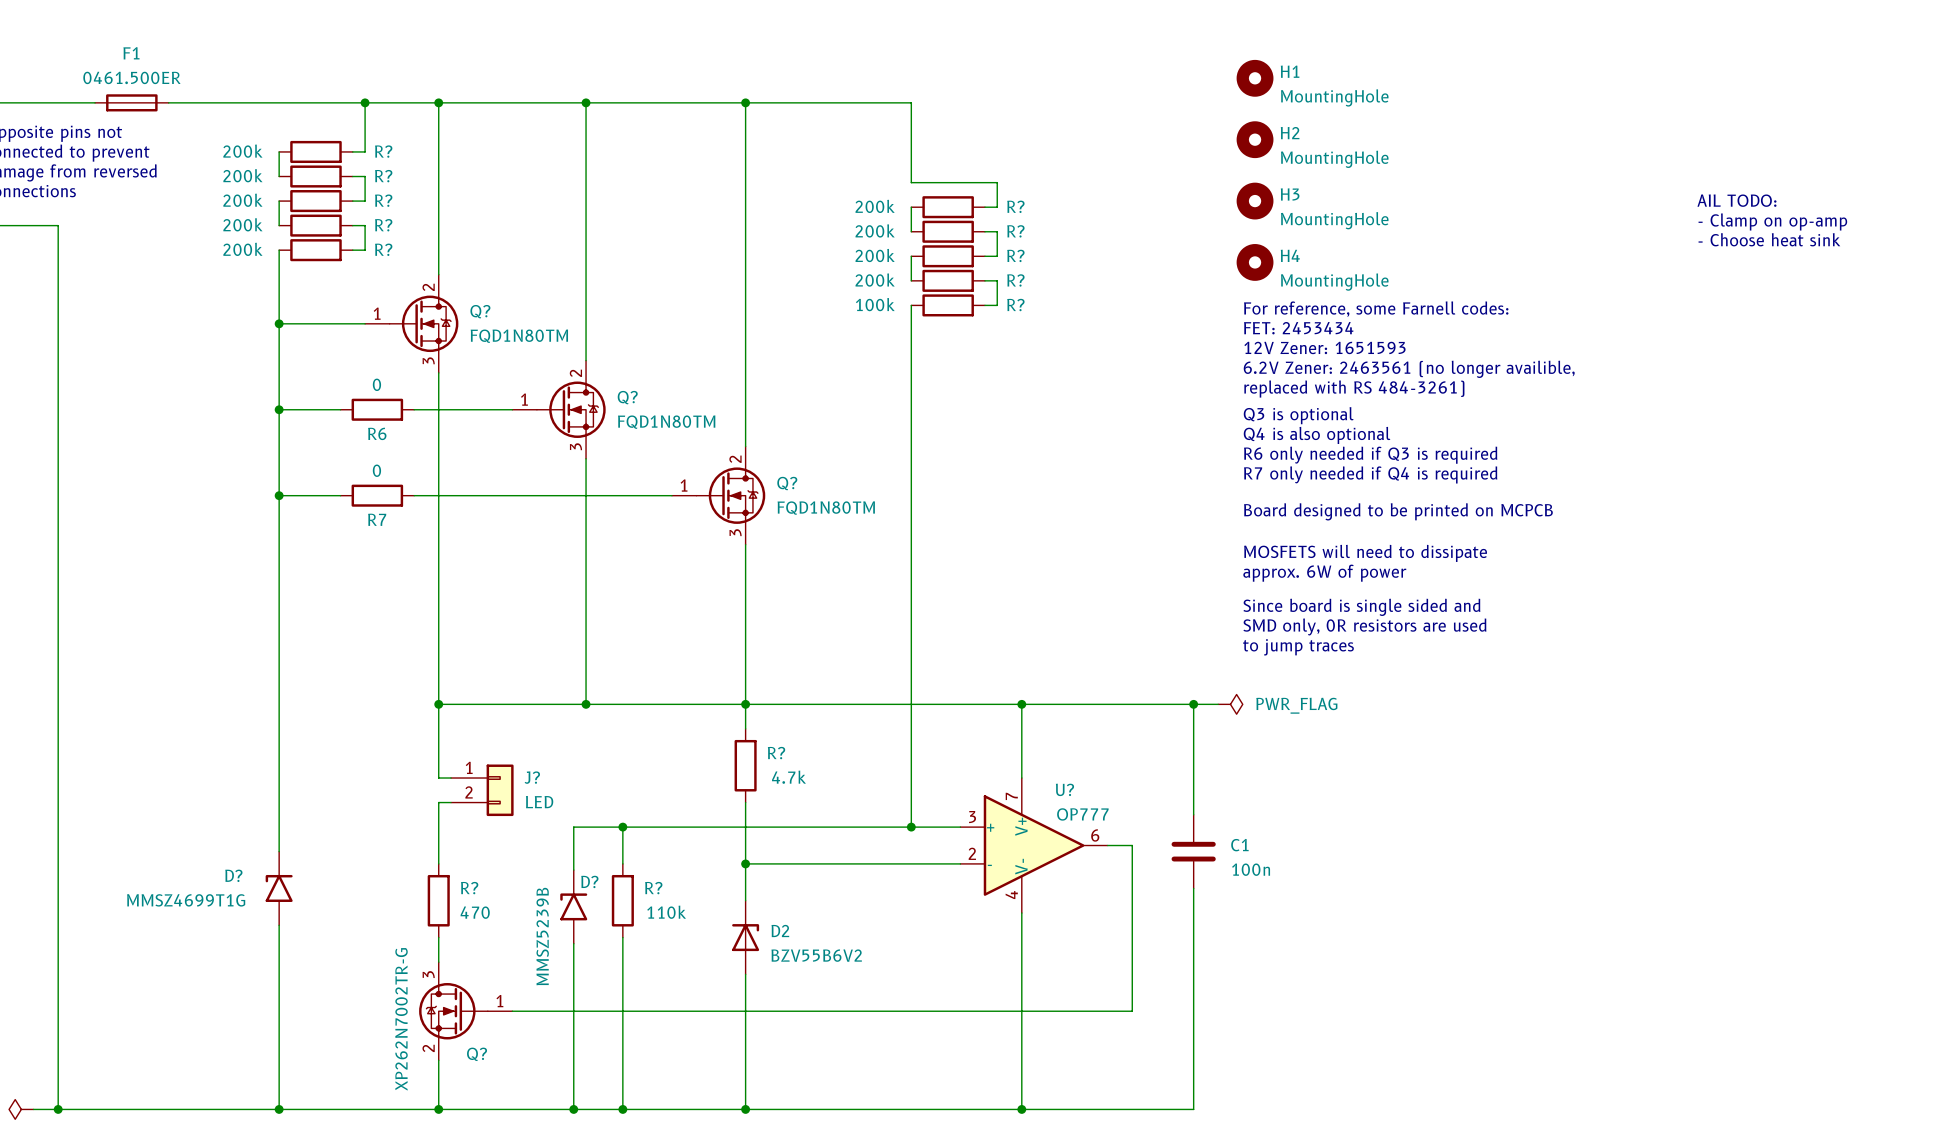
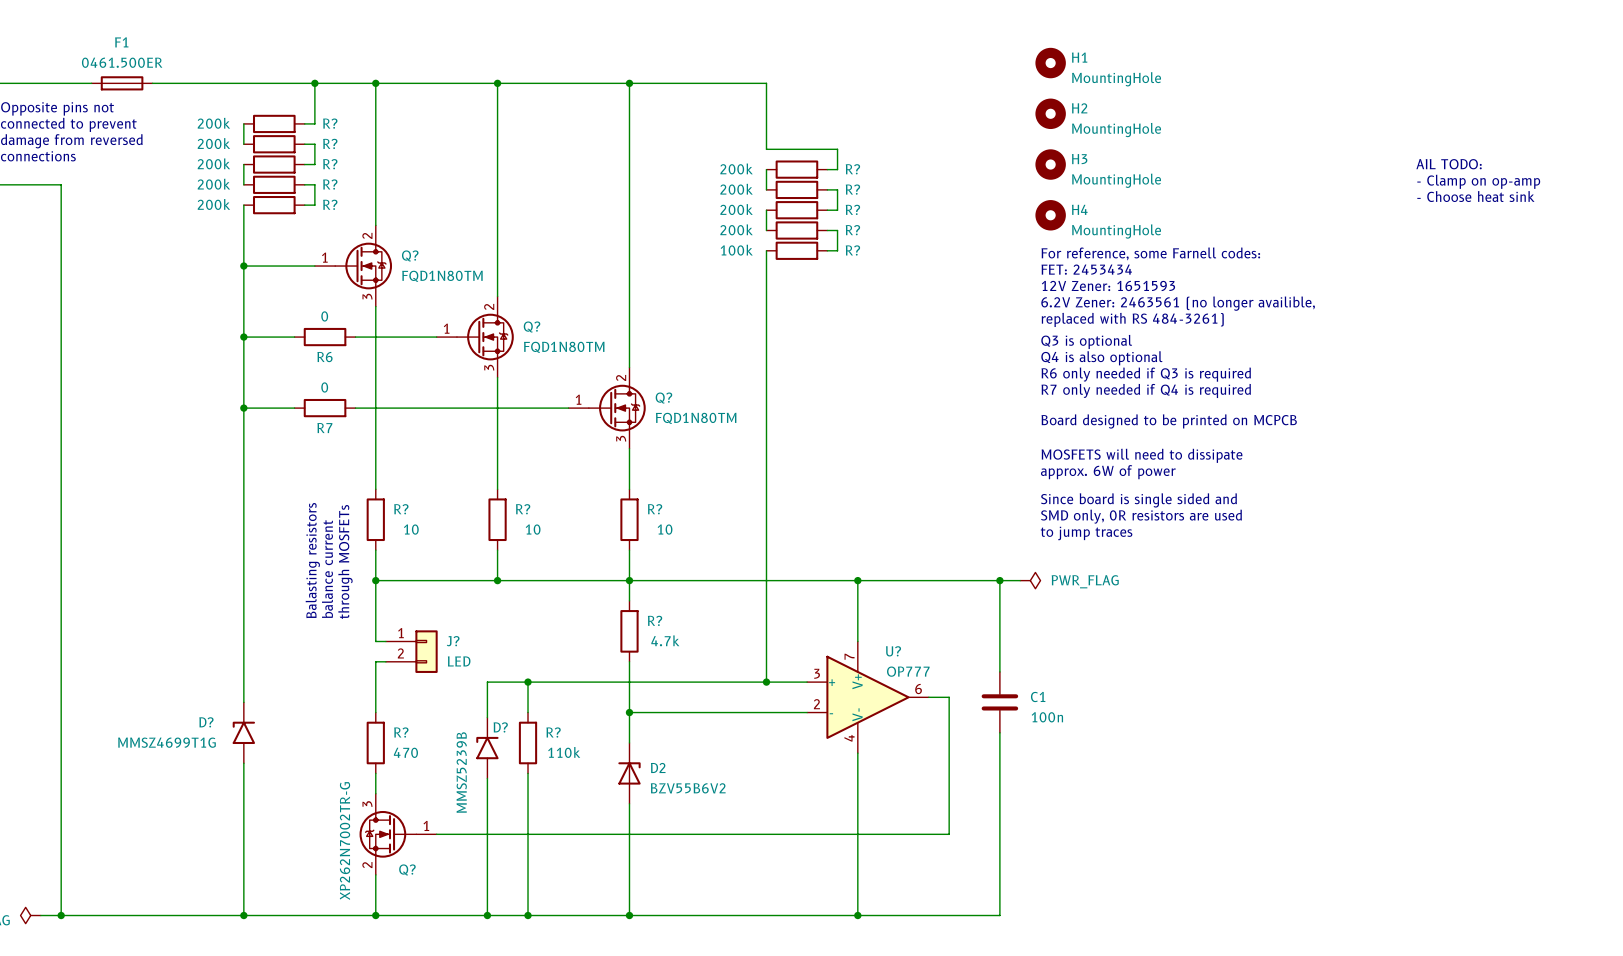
wire: (438, 593) (438, 667) -> none
wire: (586, 593) (586, 667) -> none
wire: (745, 593) (745, 667) -> none
R?: none -> 10 (375, 519)
R?: none -> 10 (497, 519)
R?: none -> 10 (629, 519)
text: none -> Balasting resistors (312, 560)
text: none -> through MOSFETs (345, 561)
text: none -> balance current (327, 569)

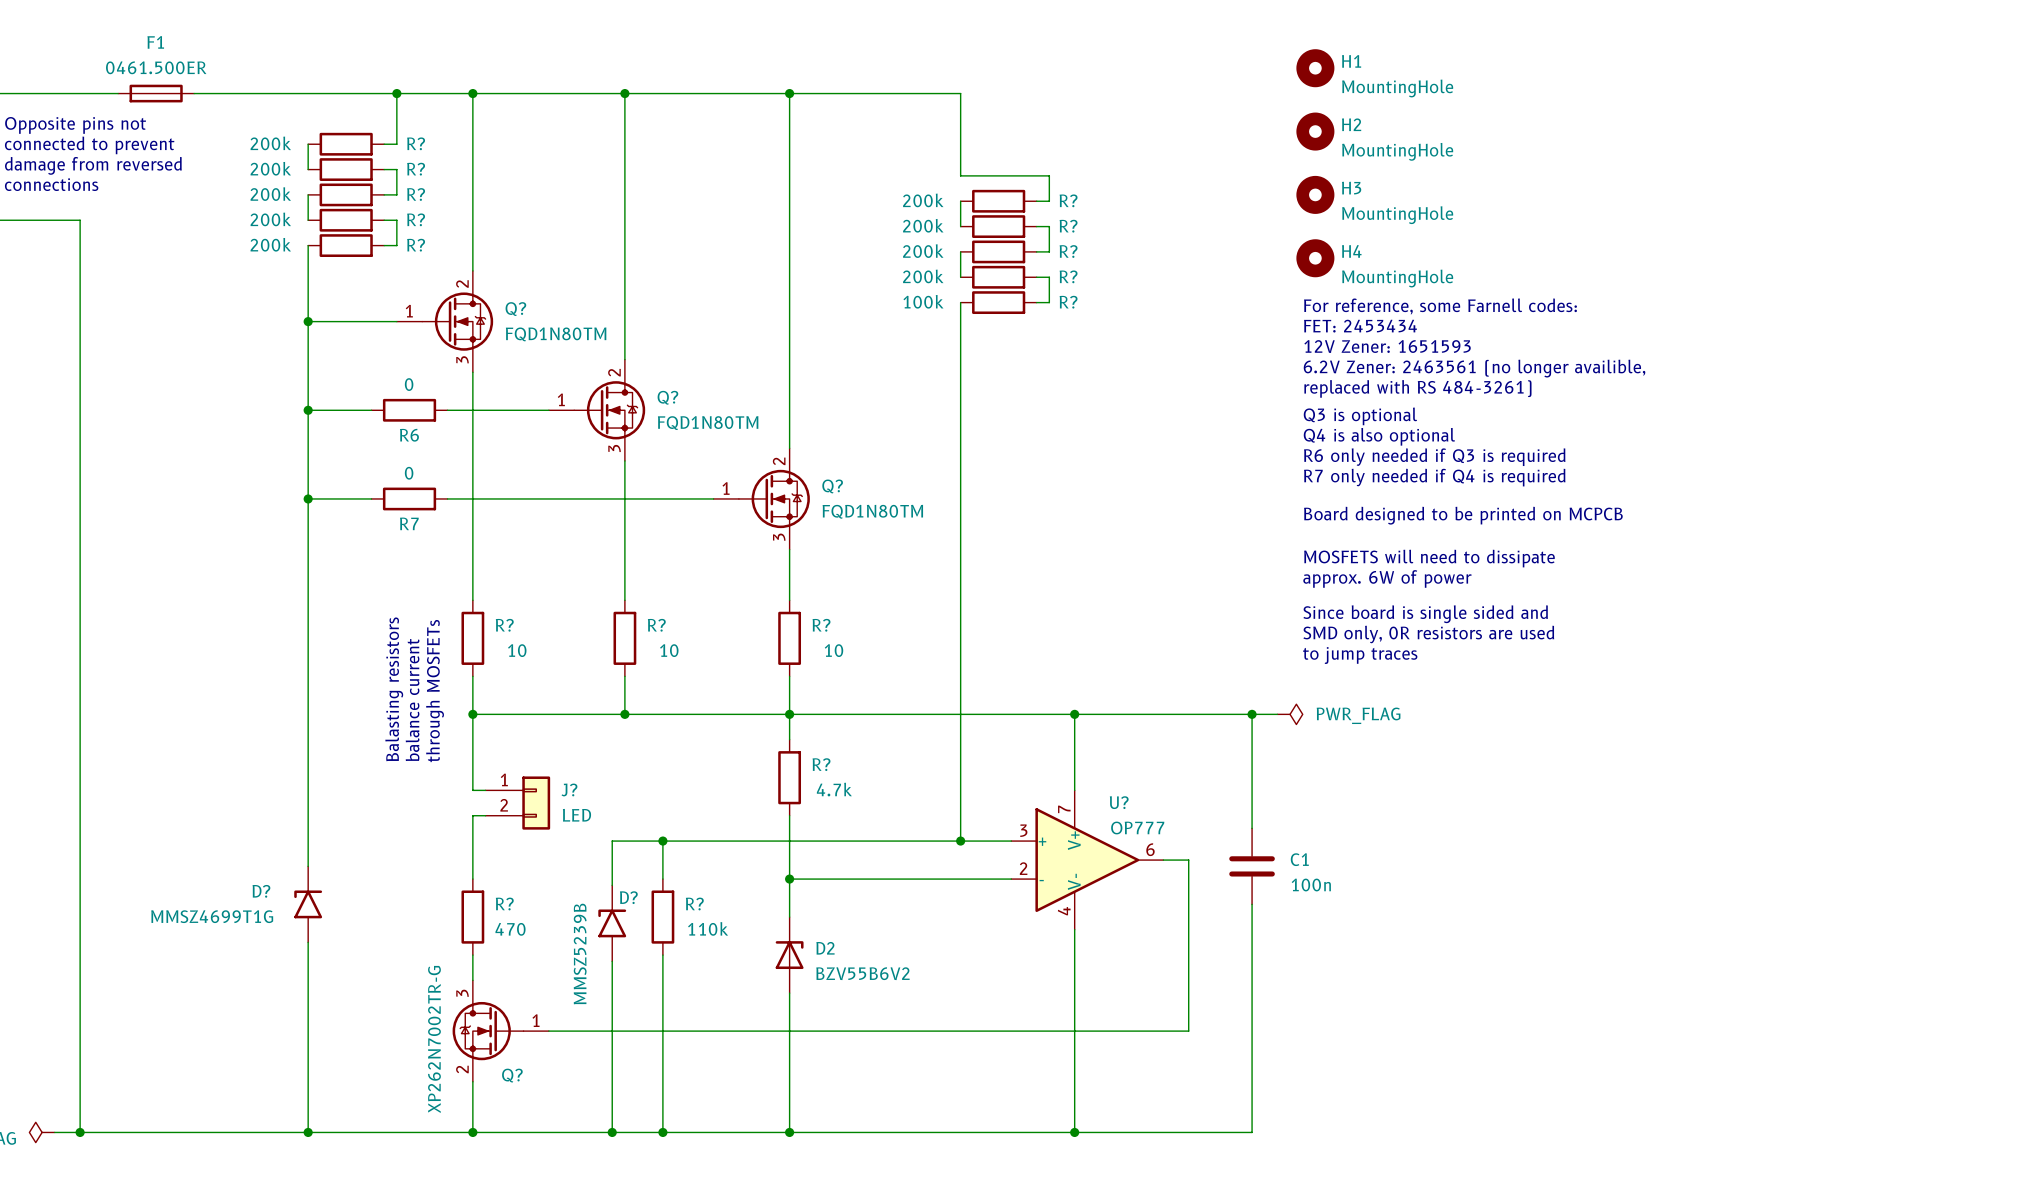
text: AIL TODO: (1449, 164) -> none
text: - Clamp on op-amp (1478, 181) -> none
text: - Choose heat sink (1475, 196) -> none

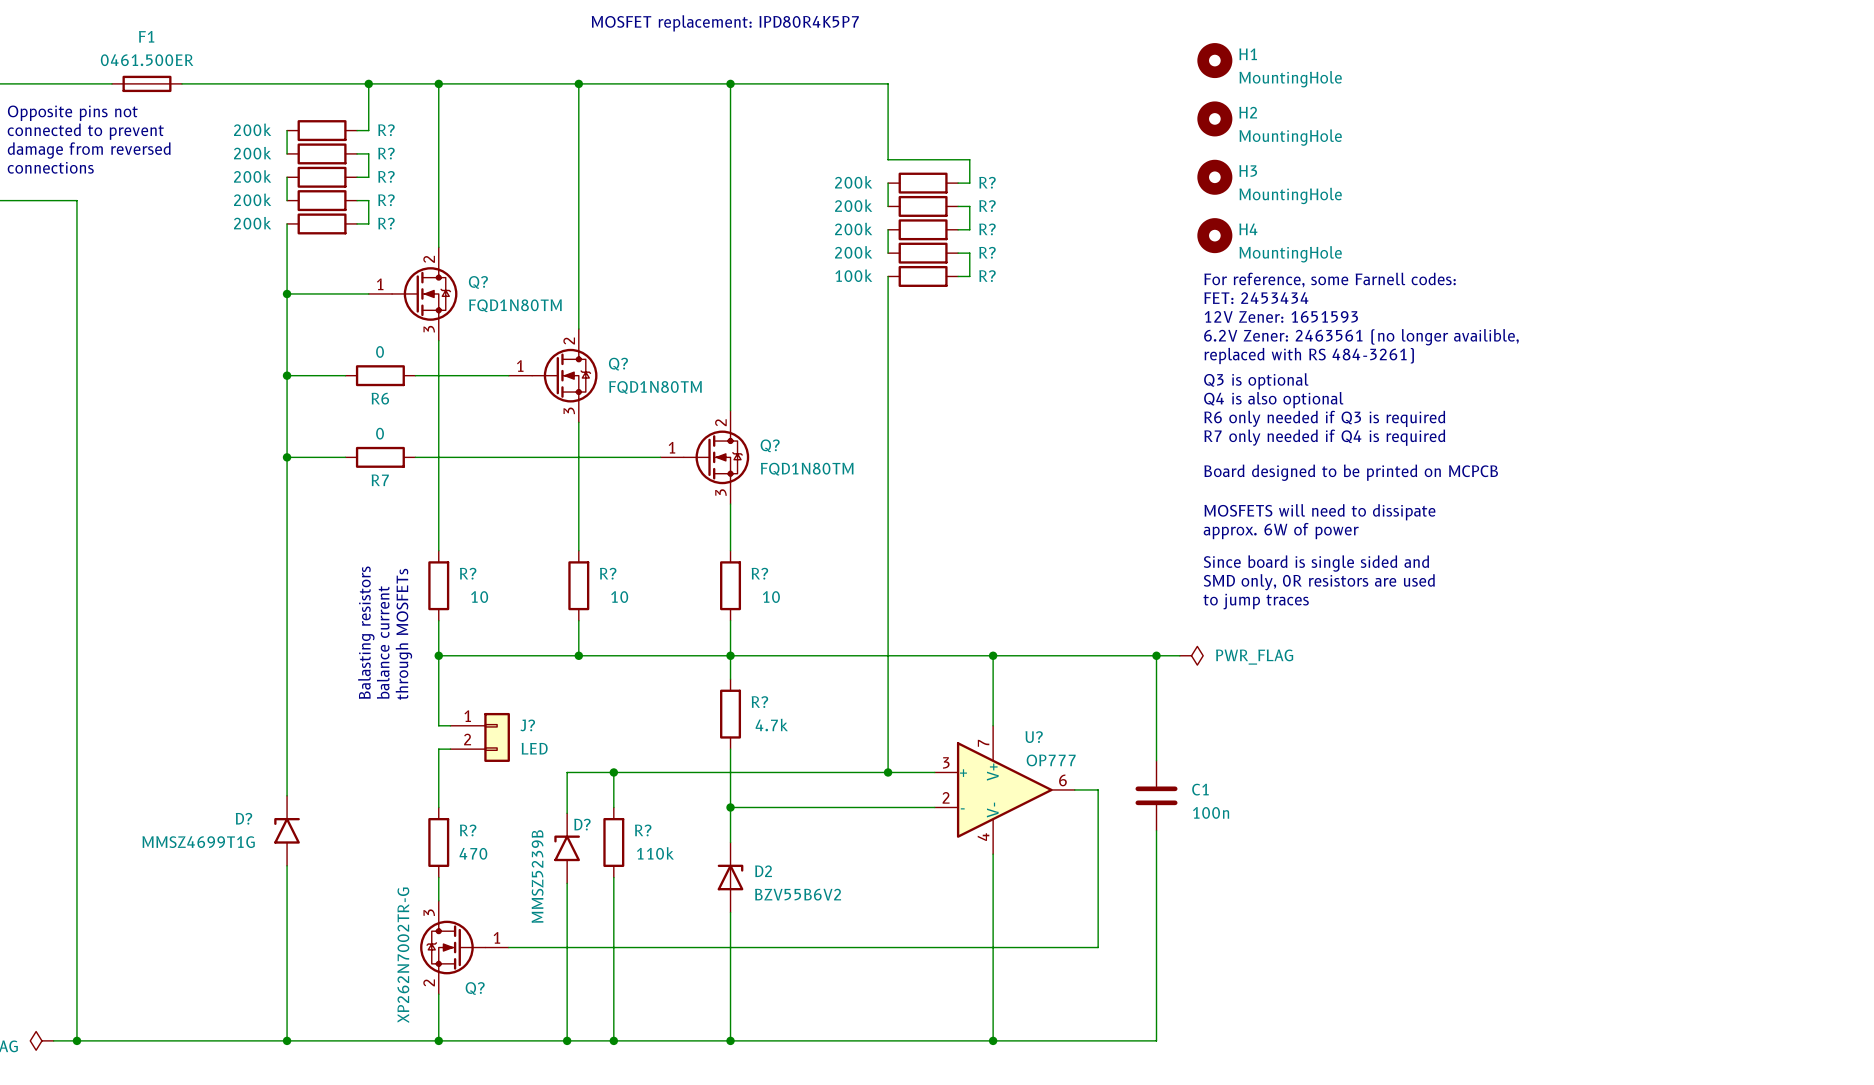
text: none -> MOSFET replacement: IPD80R4K5P7 (725, 23)

